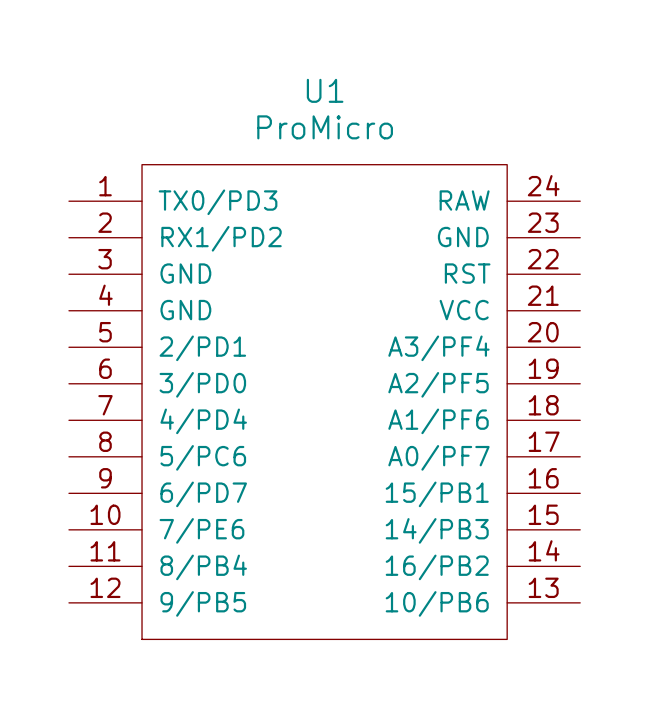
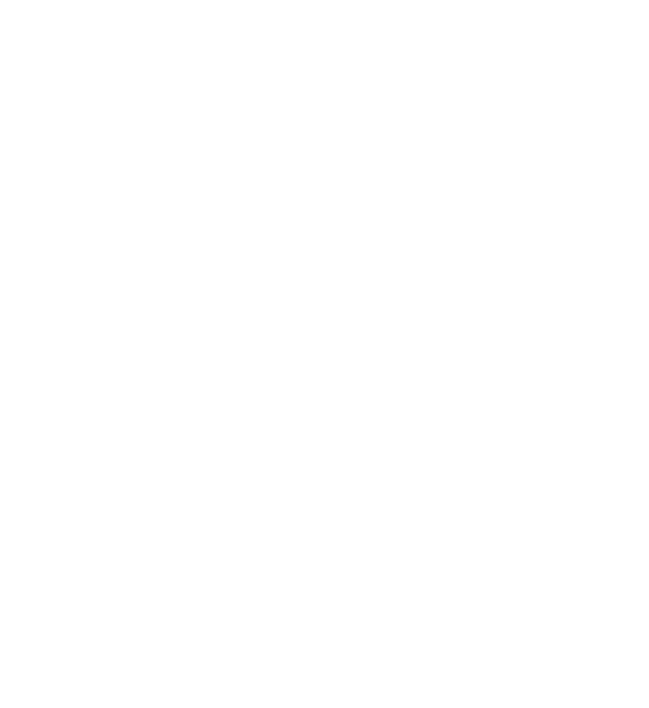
U1: ProMicro (324, 402) -> none

